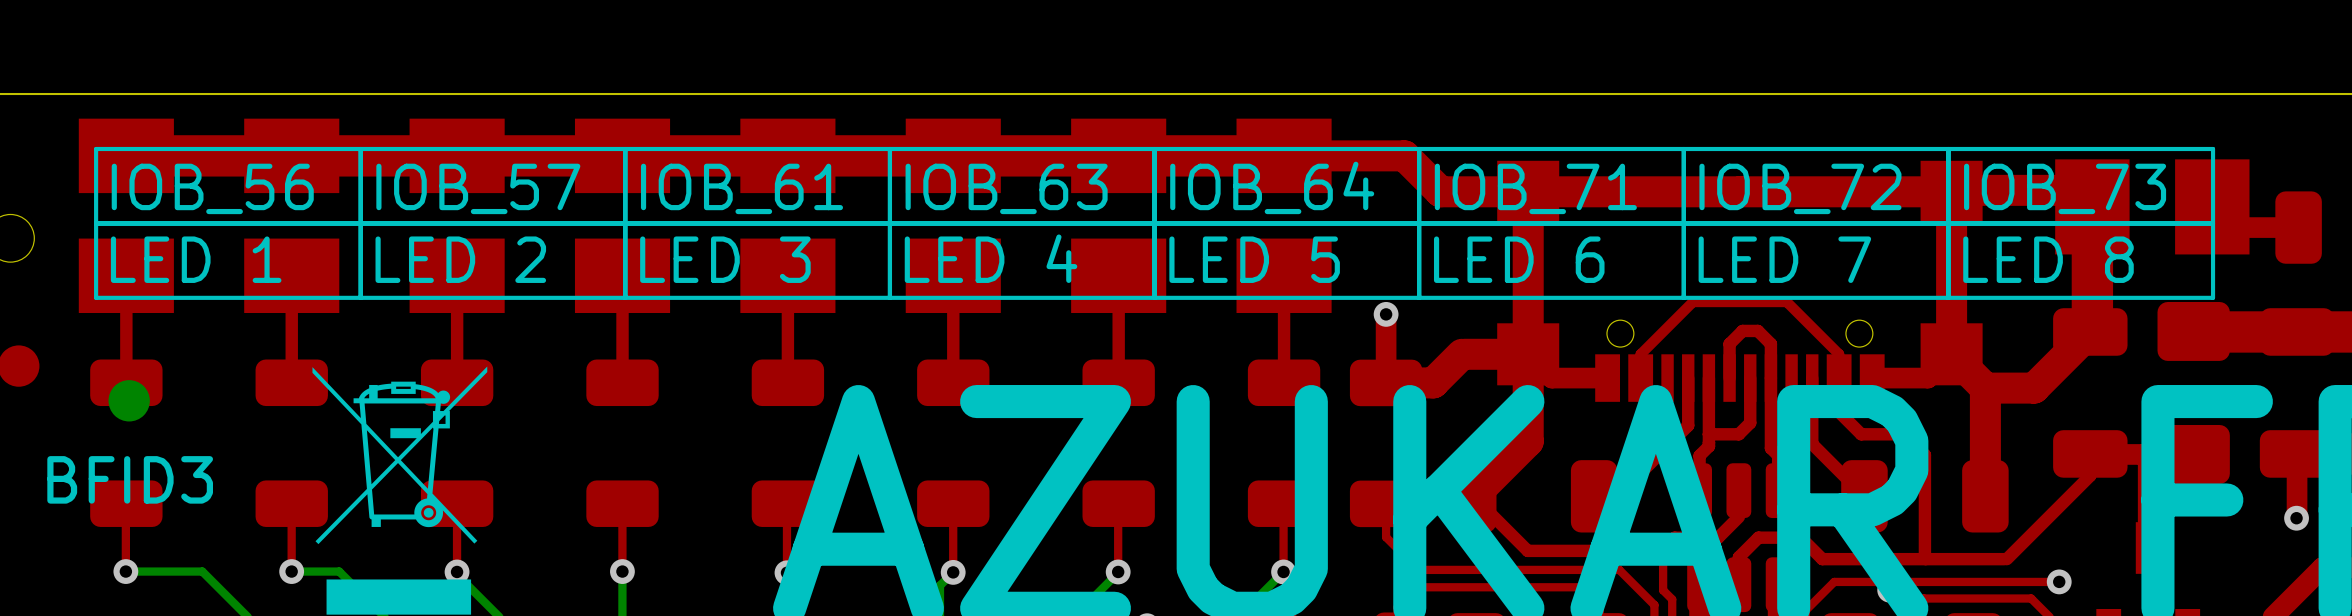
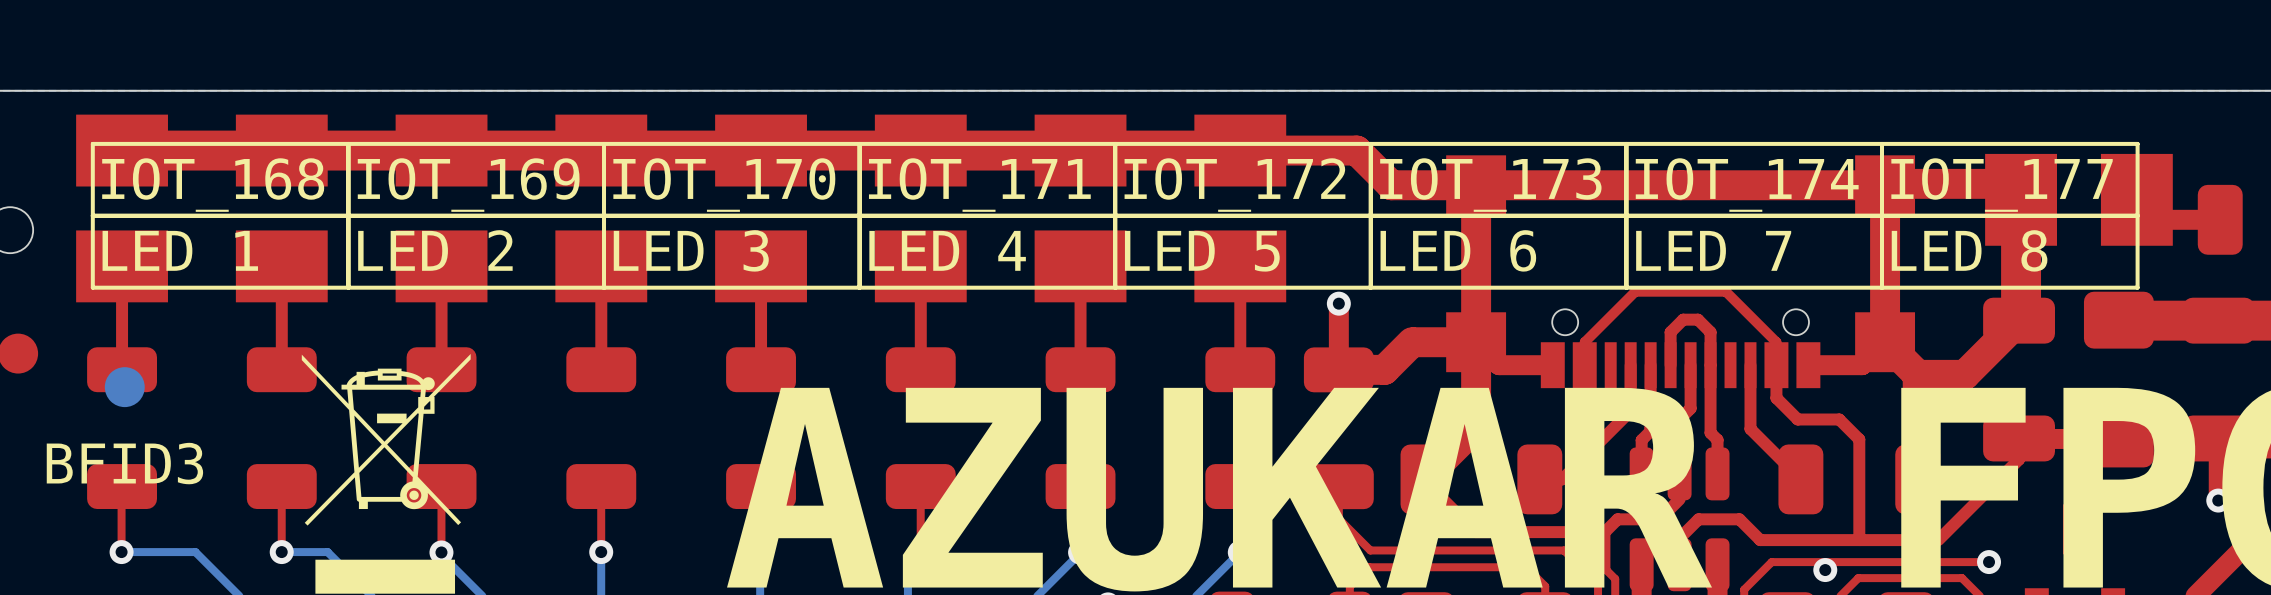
text: IOB_64 (1272, 187) -> IOT_172 (1234, 185)
text: IOB_56 (212, 188) -> IOT_168 (213, 185)
text: IOB_57 (478, 188) -> IOT_169 (468, 185)
text: IOB_61 (741, 188) -> IOT_170 (724, 185)
text: IOB_63 (1006, 188) -> IOT_171 (979, 185)
text: IOB_71 (1535, 188) -> IOT_173 (1490, 185)
text: IOB_72 (1800, 188) -> IOT_174 (1747, 185)
text: IOB_73 (2065, 188) -> IOT_177 (2002, 185)

